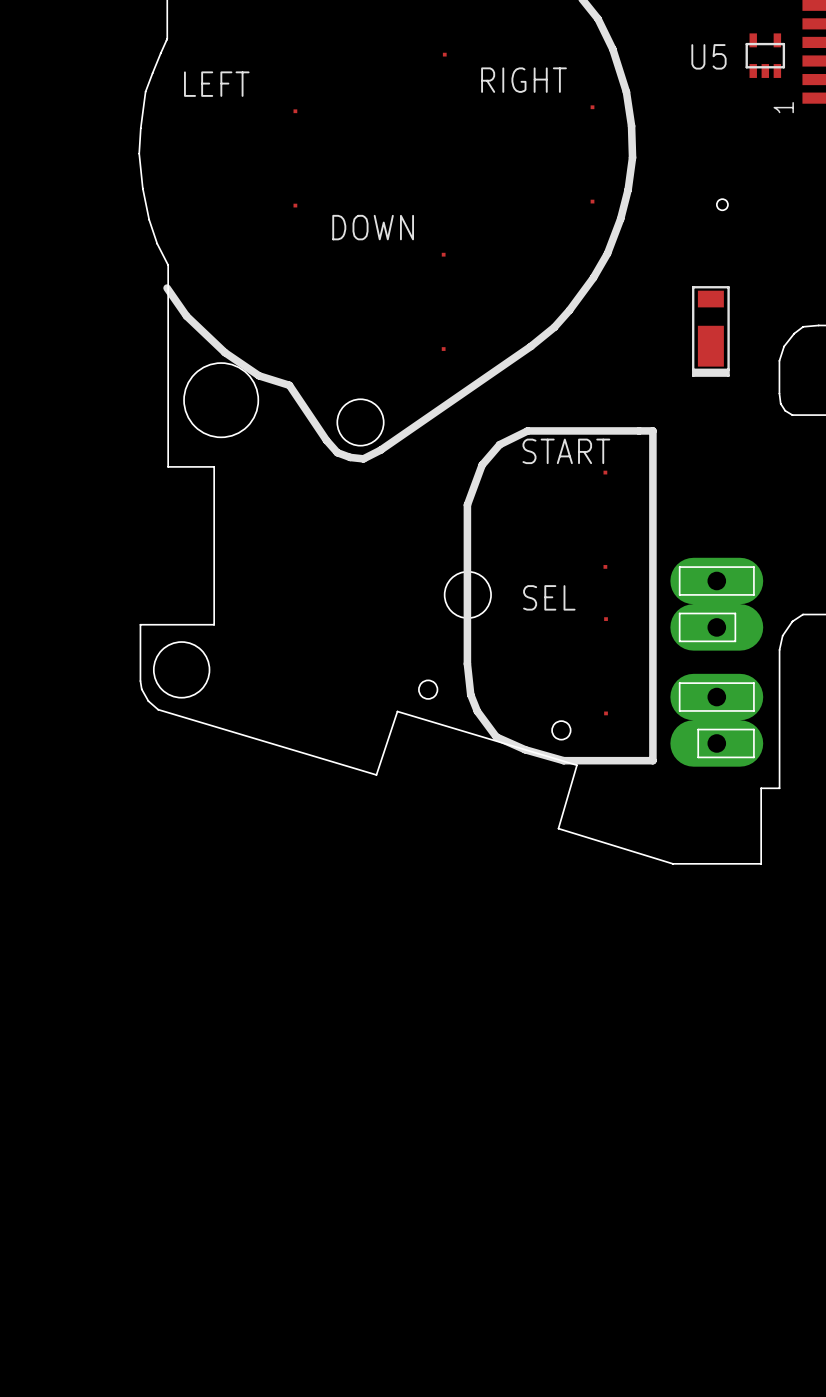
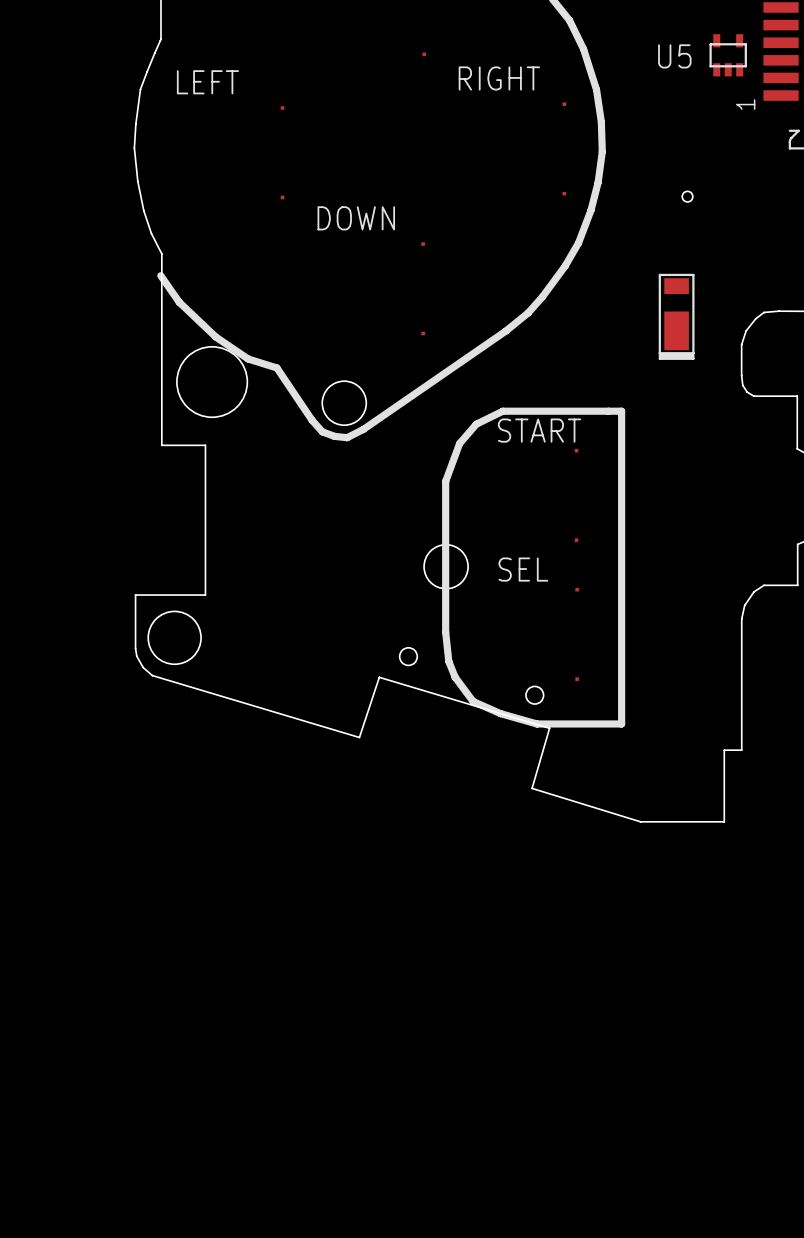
part: (716, 662) -> none

